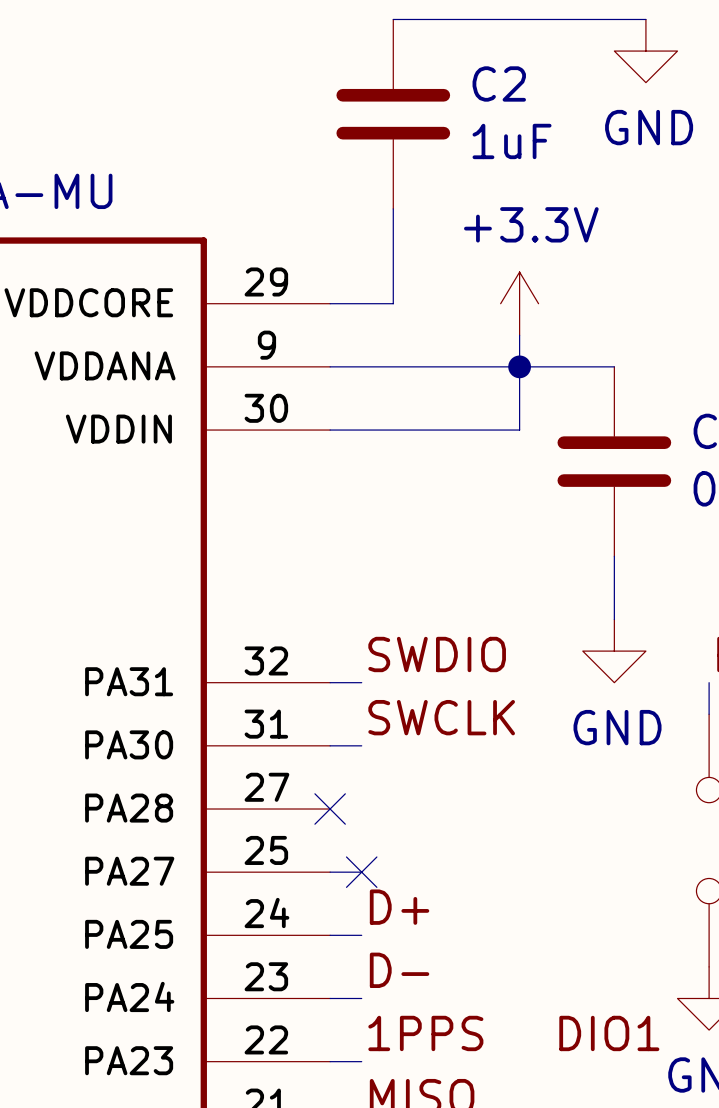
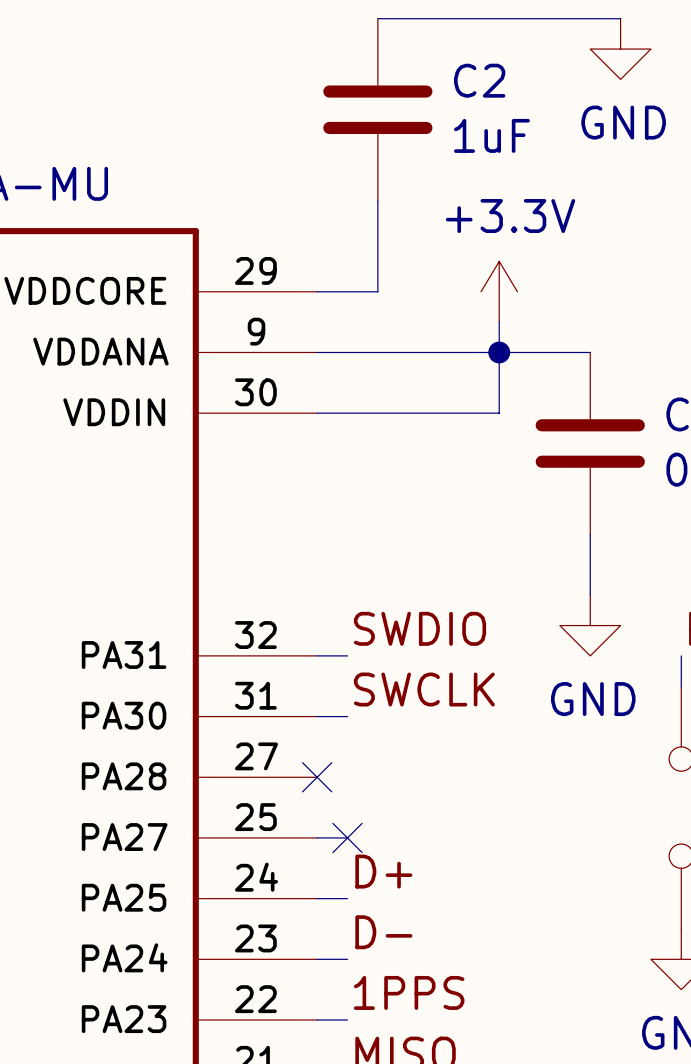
label: DIO1 (609, 1033) -> none

